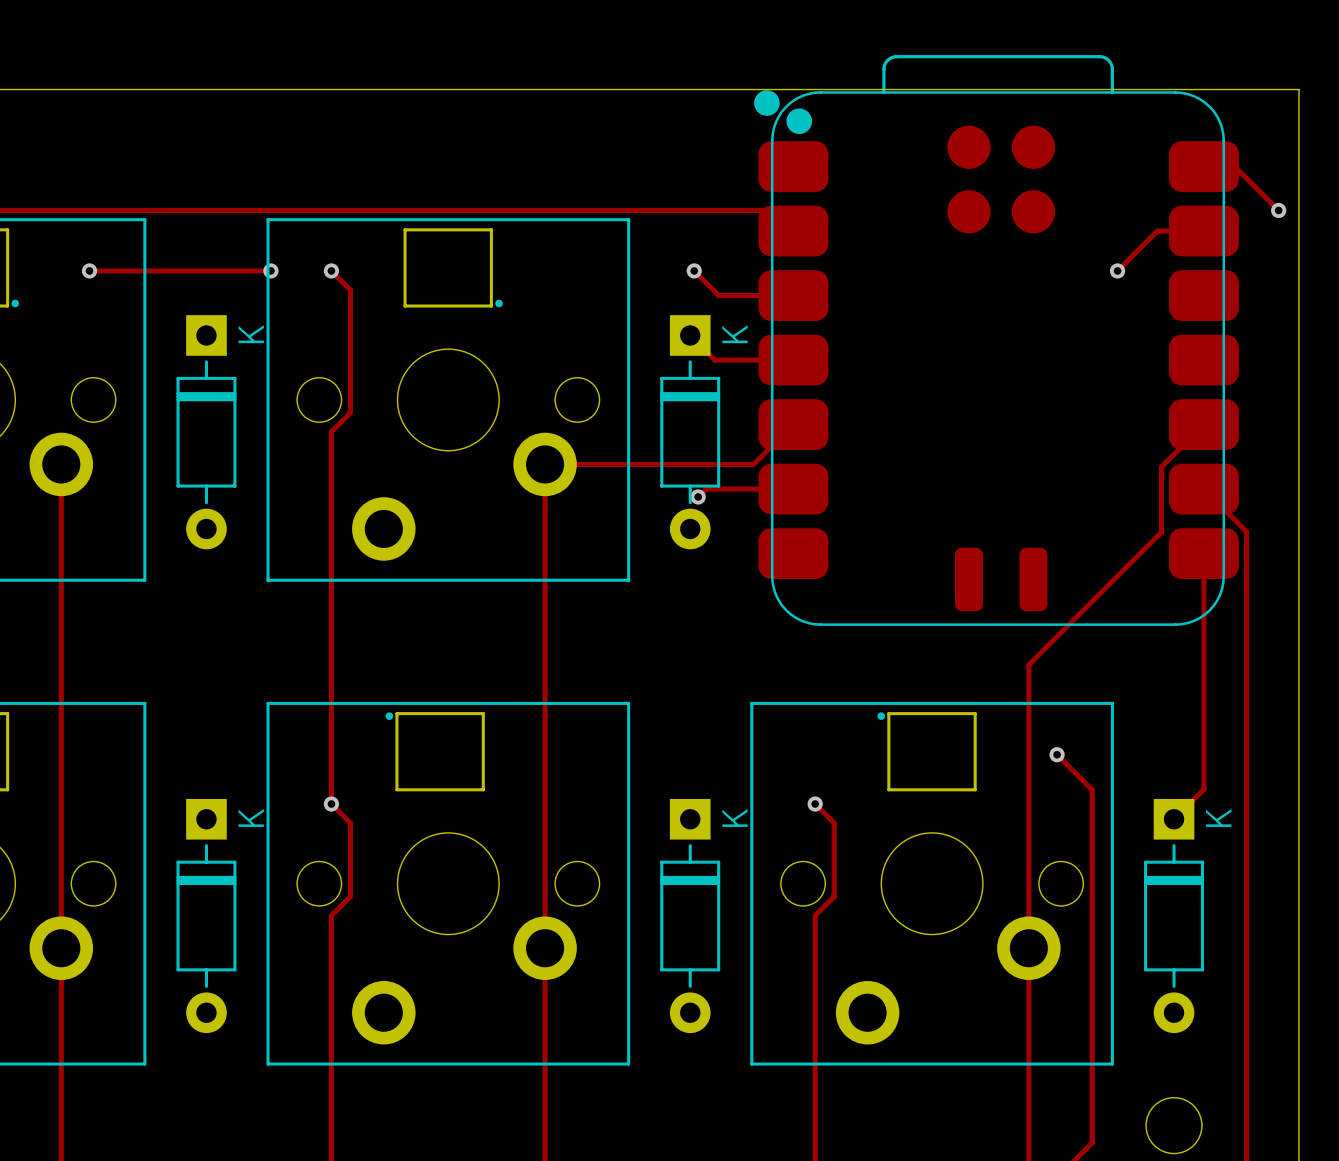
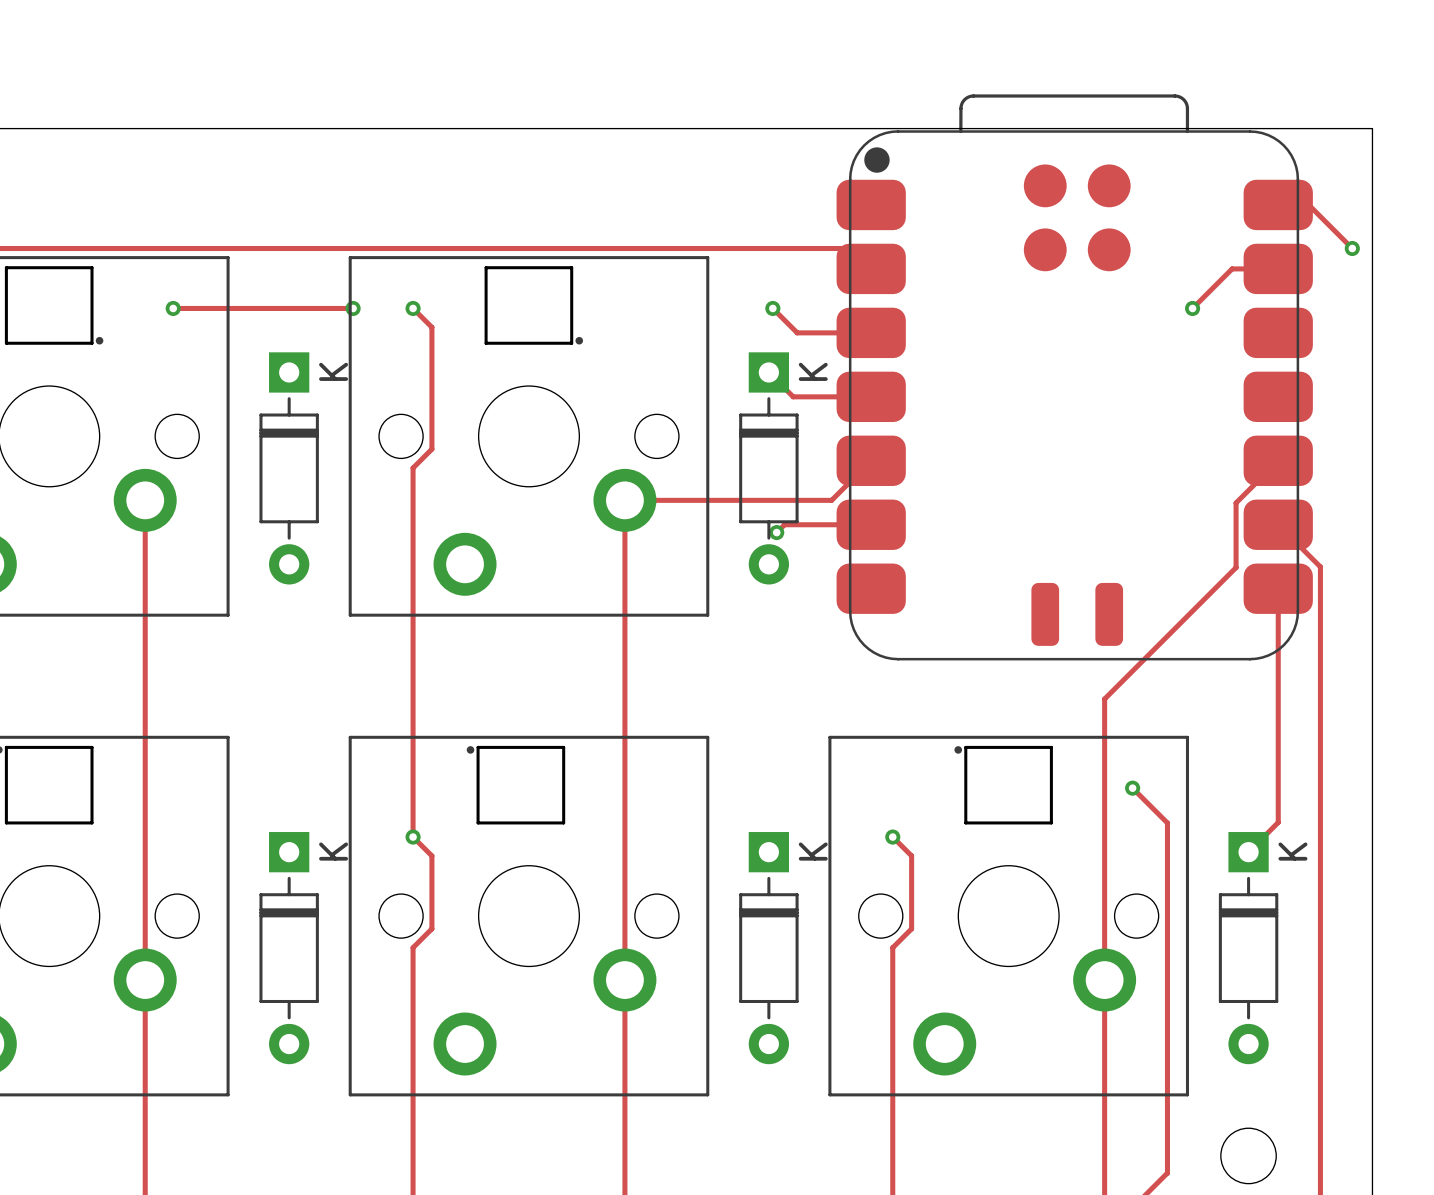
part footprint: [754, 55, 1239, 626] -> [836, 94, 1313, 661]

